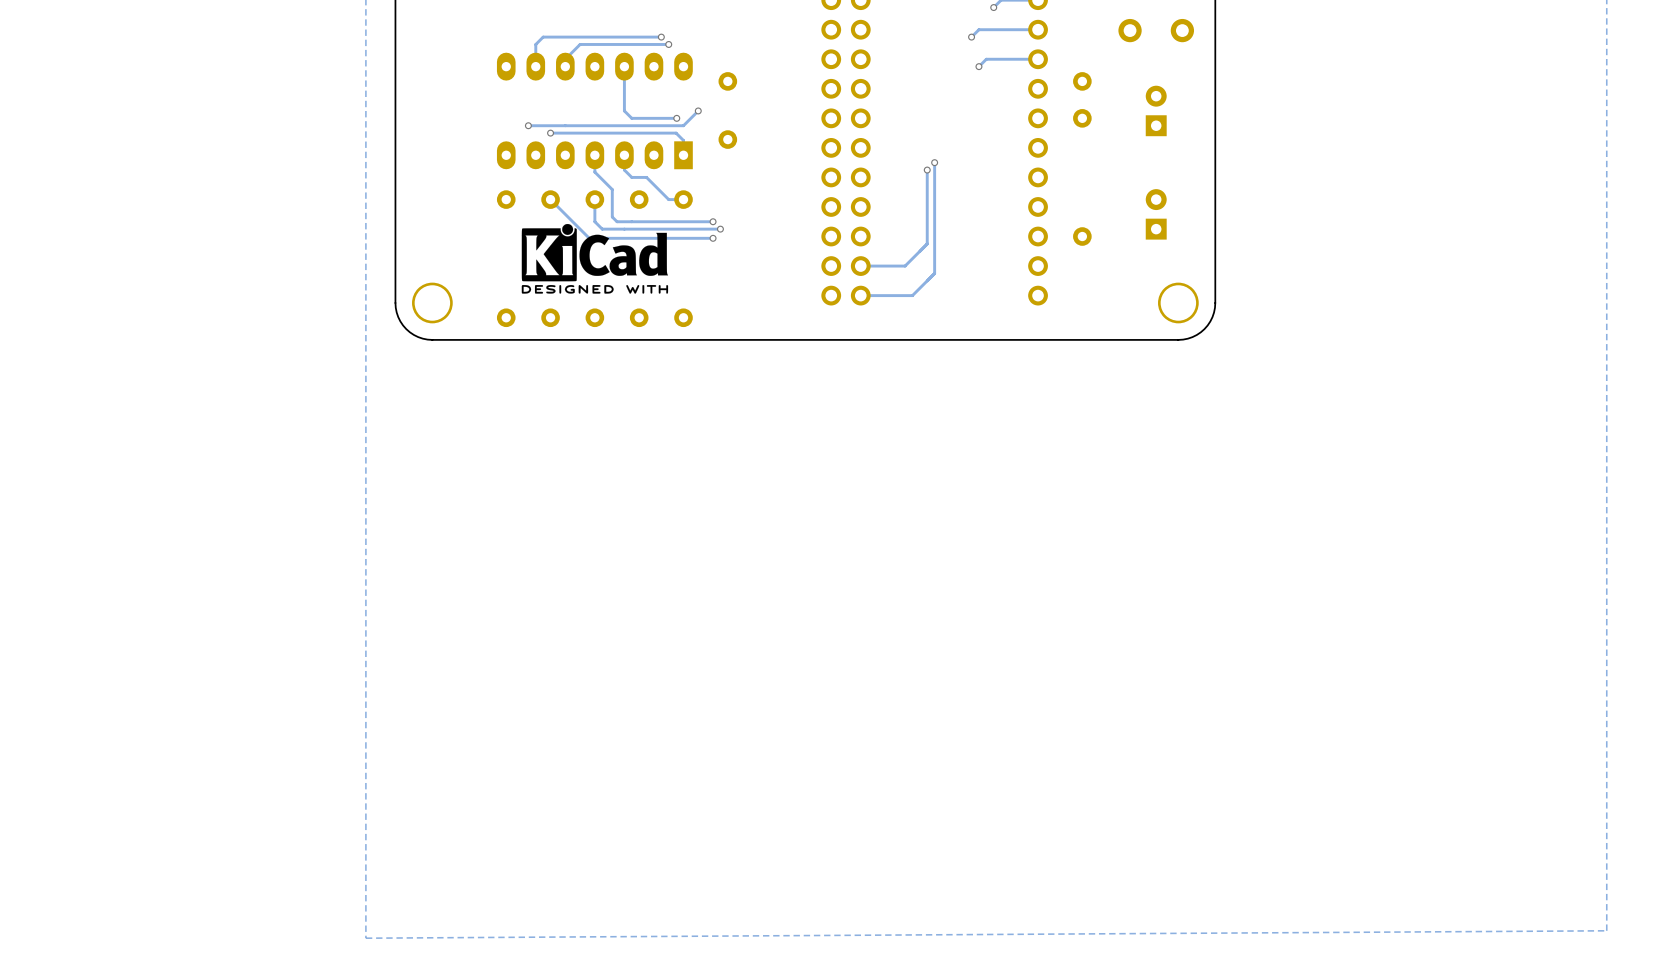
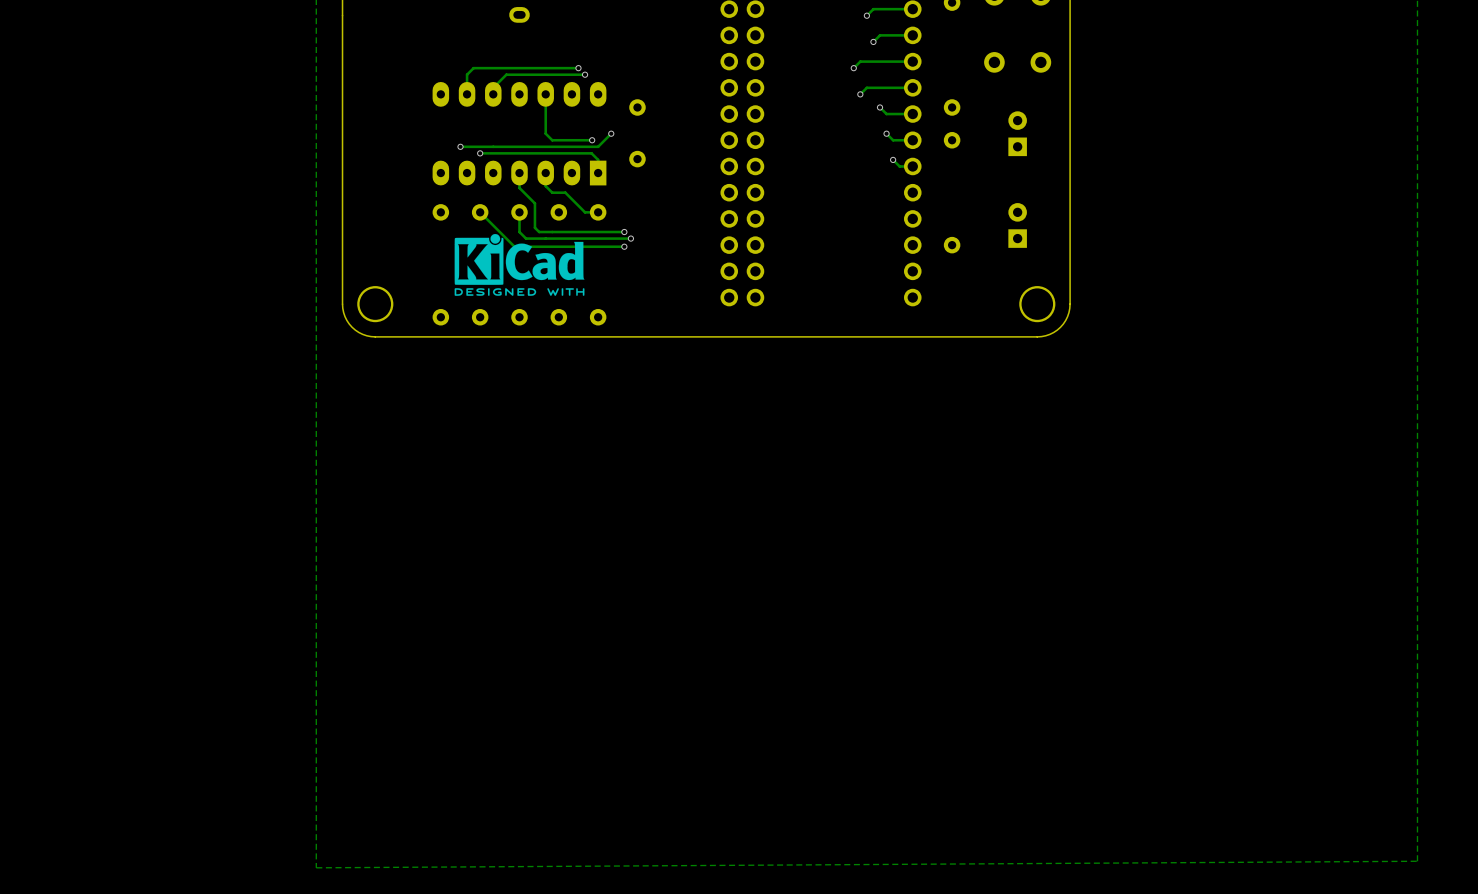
track: none -> (880, 107) (886, 114) (912, 114)
via: none -> (880, 107)
track: none -> (886, 133) (893, 140) (912, 140)
via: none -> (886, 133)
track: none -> (893, 159) (899, 166) (912, 166)
via: none -> (893, 159)
track: (934, 162) (934, 273) (912, 295) (860, 295) -> none
via: (934, 162) -> none
track: (927, 170) (927, 243) (905, 266) (860, 266) -> none
via: (927, 170) -> none

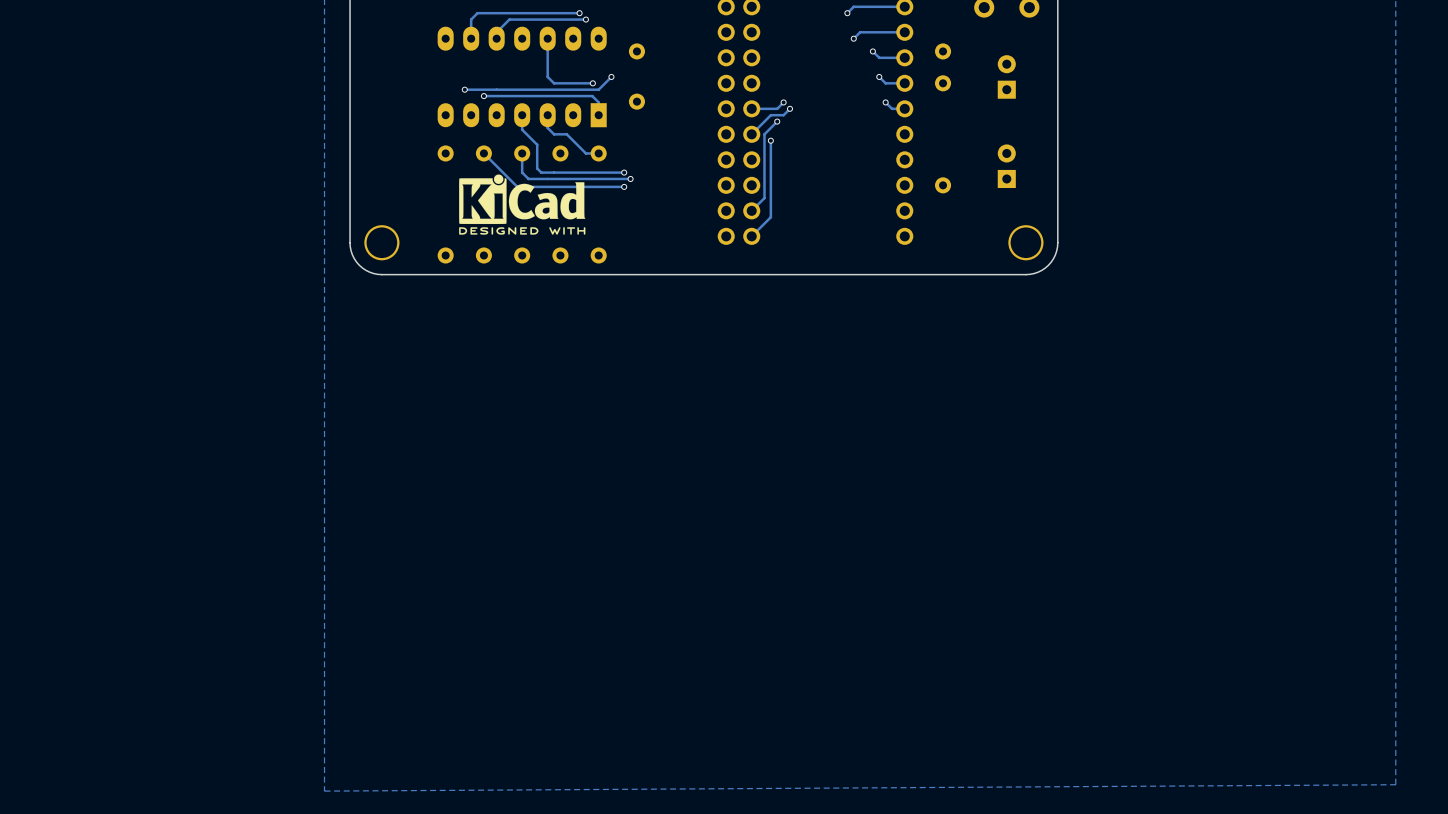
track: none -> (783, 102) (777, 108) (751, 108)
via: none -> (783, 102)
track: none -> (789, 108) (783, 115) (770, 115) (751, 134)
via: none -> (789, 108)
track: none -> (777, 121) (764, 134) (764, 198) (751, 210)
via: none -> (777, 121)
track: none -> (770, 140) (770, 217) (751, 236)
via: none -> (770, 140)

